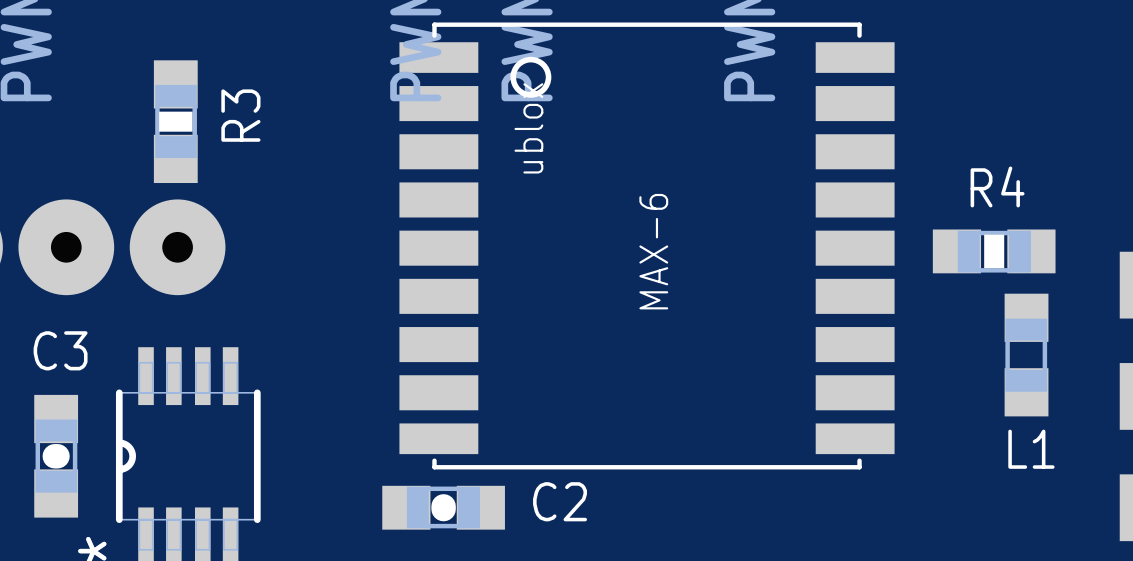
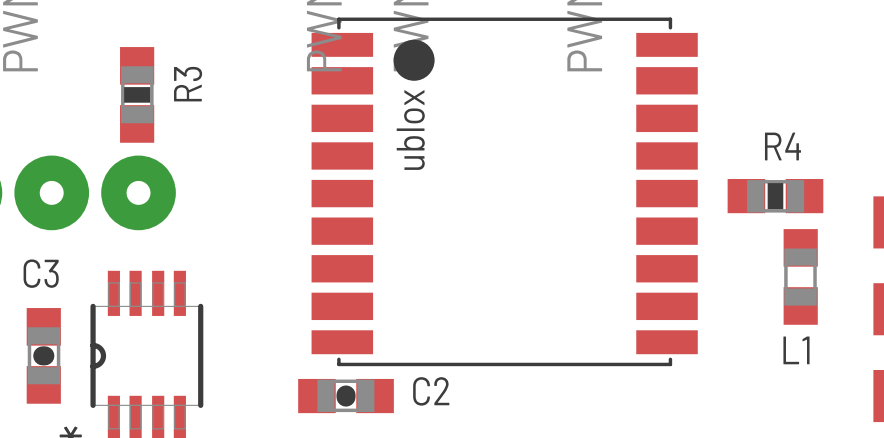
part footprint: [399, 22, 895, 470] -> [311, 17, 698, 367]

